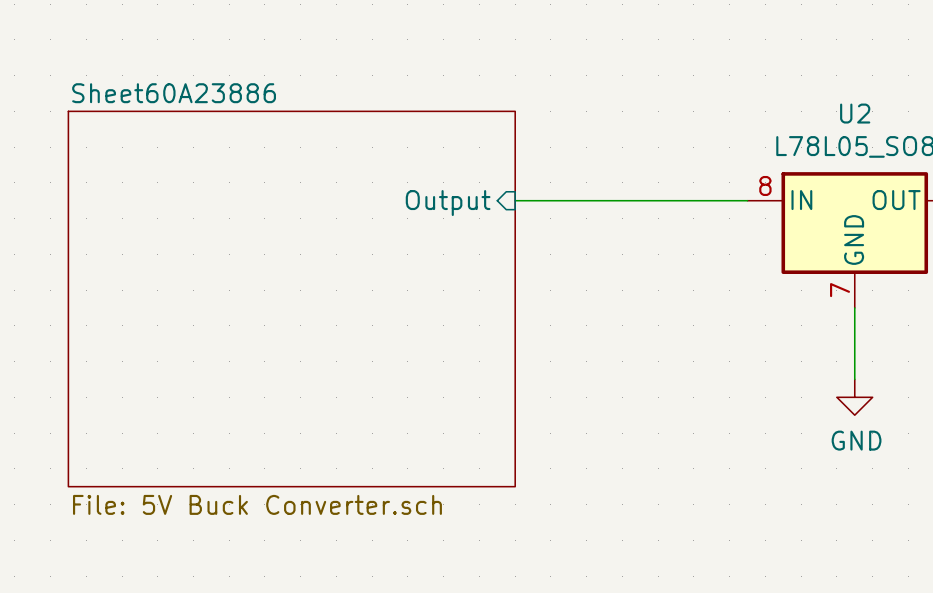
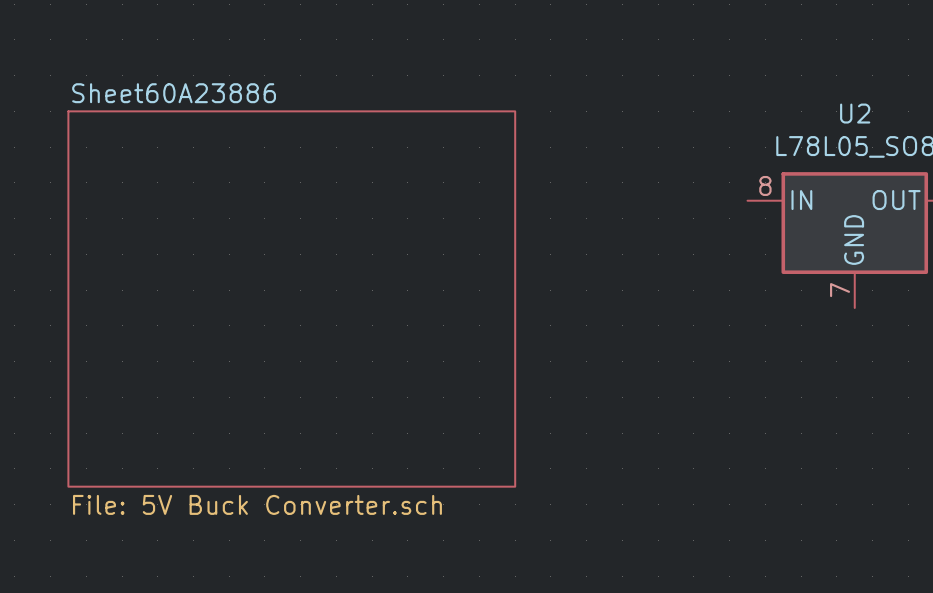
wire: (515, 200) (747, 200) -> none
sheet pin: Output (448, 203) -> none
wire: (854, 307) (854, 379) -> none
power symbol: GND (854, 397) -> none

